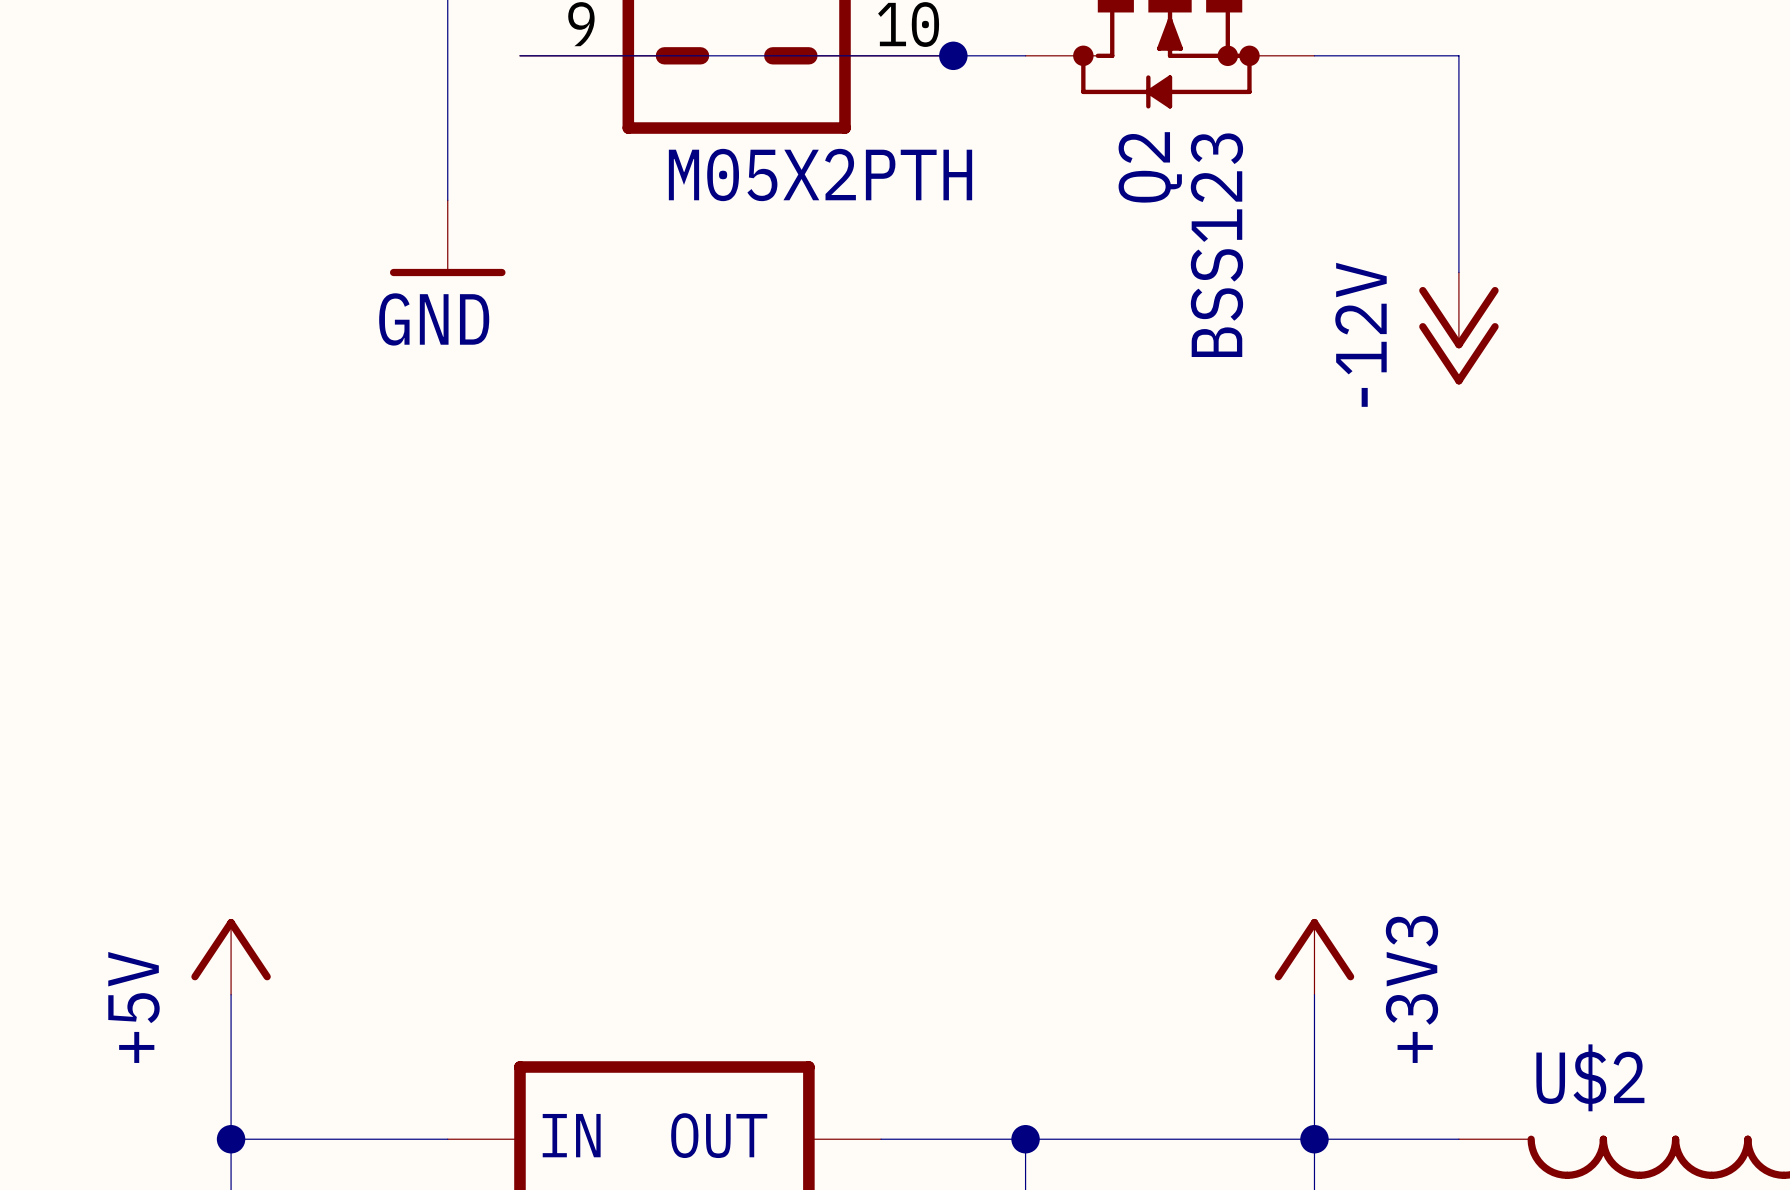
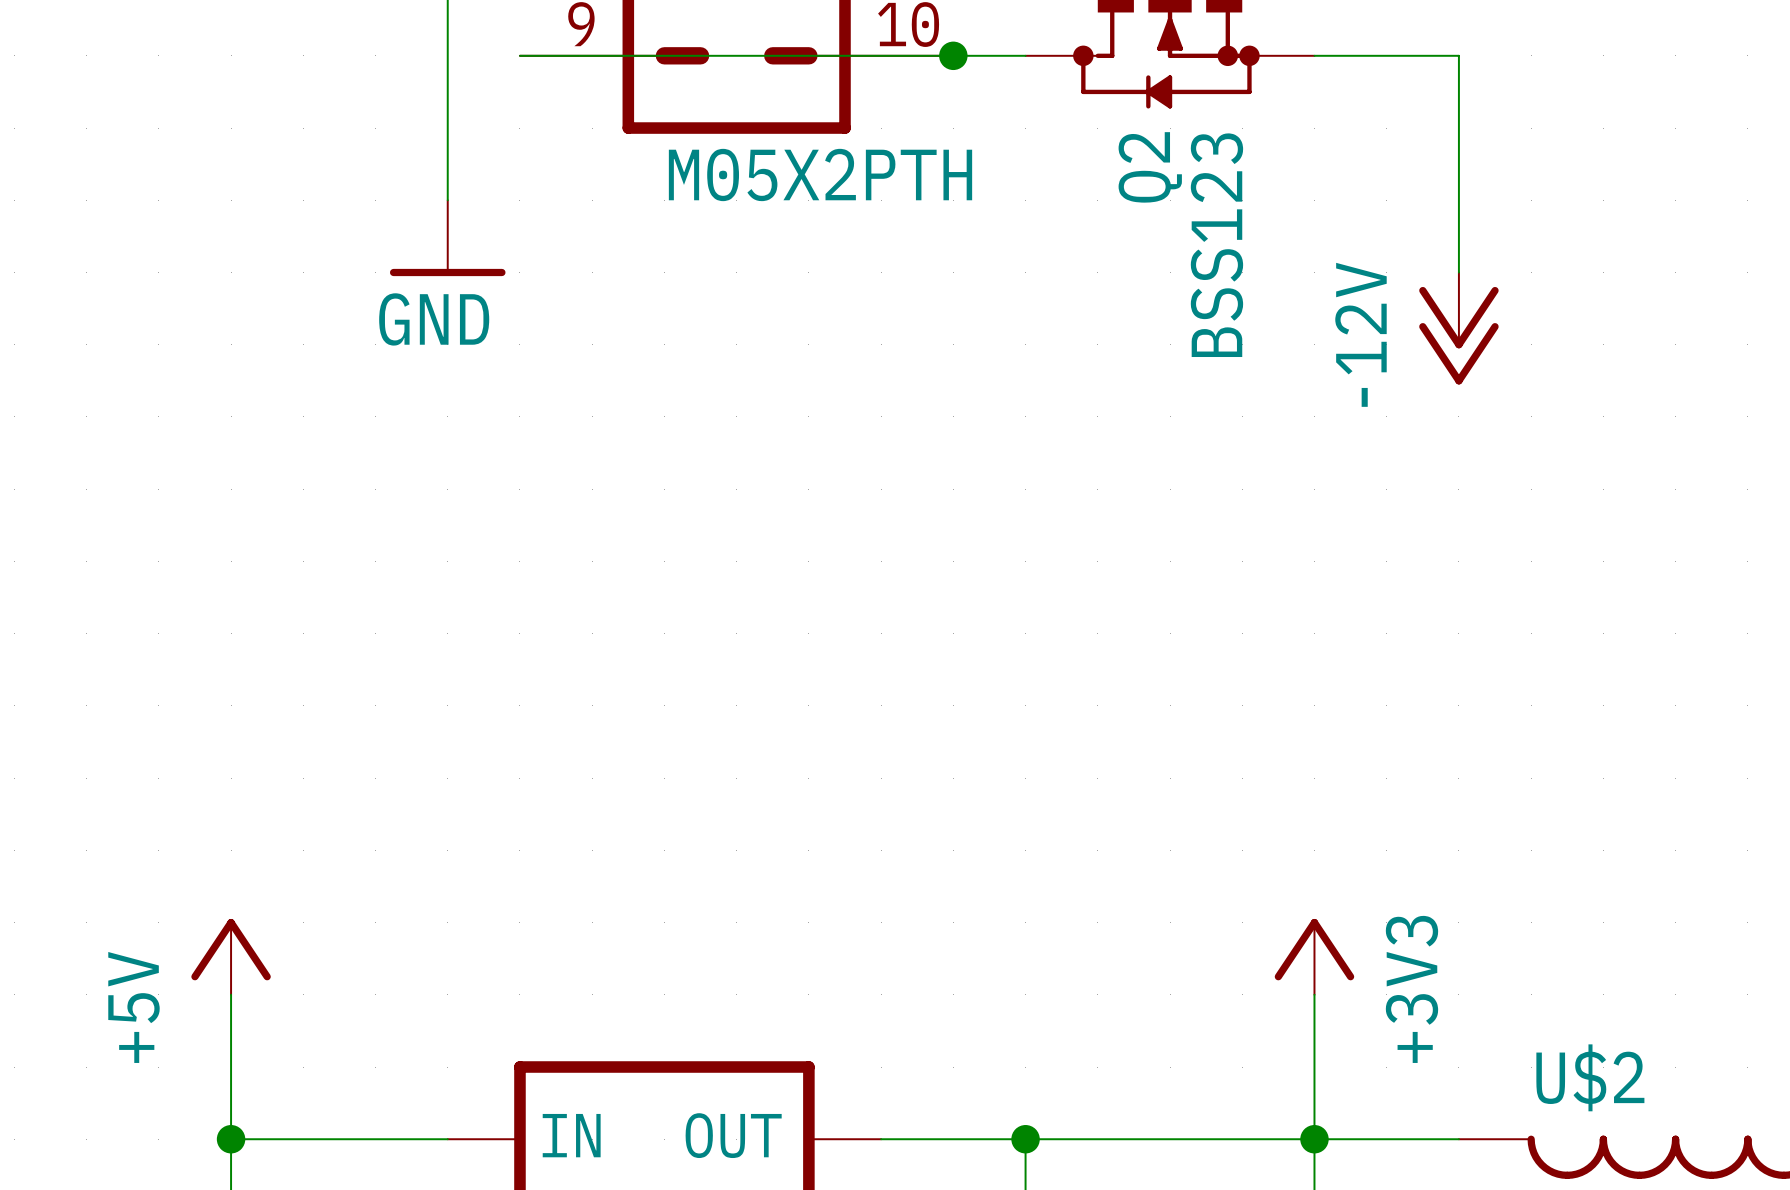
part text position: OUT (719, 1135) -> OUT (733, 1135)

